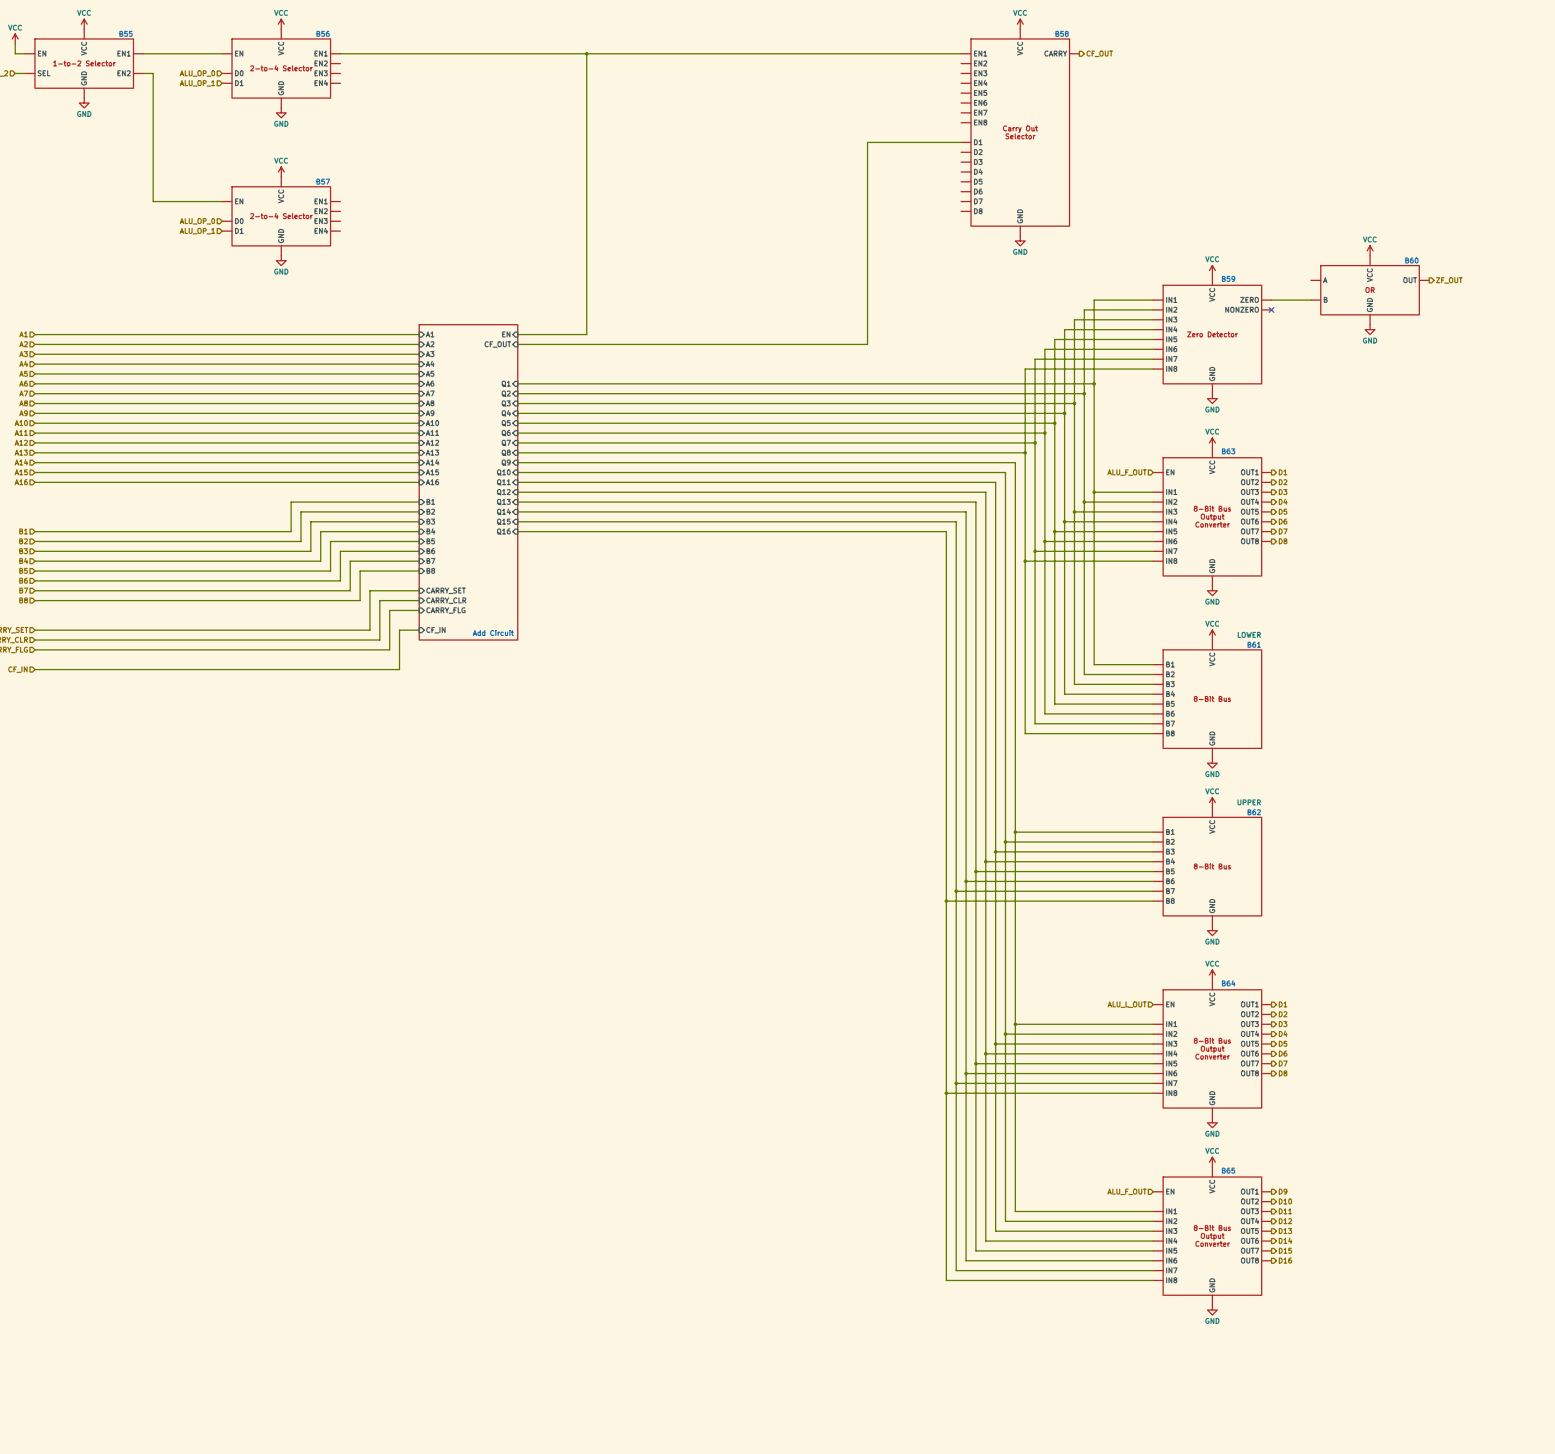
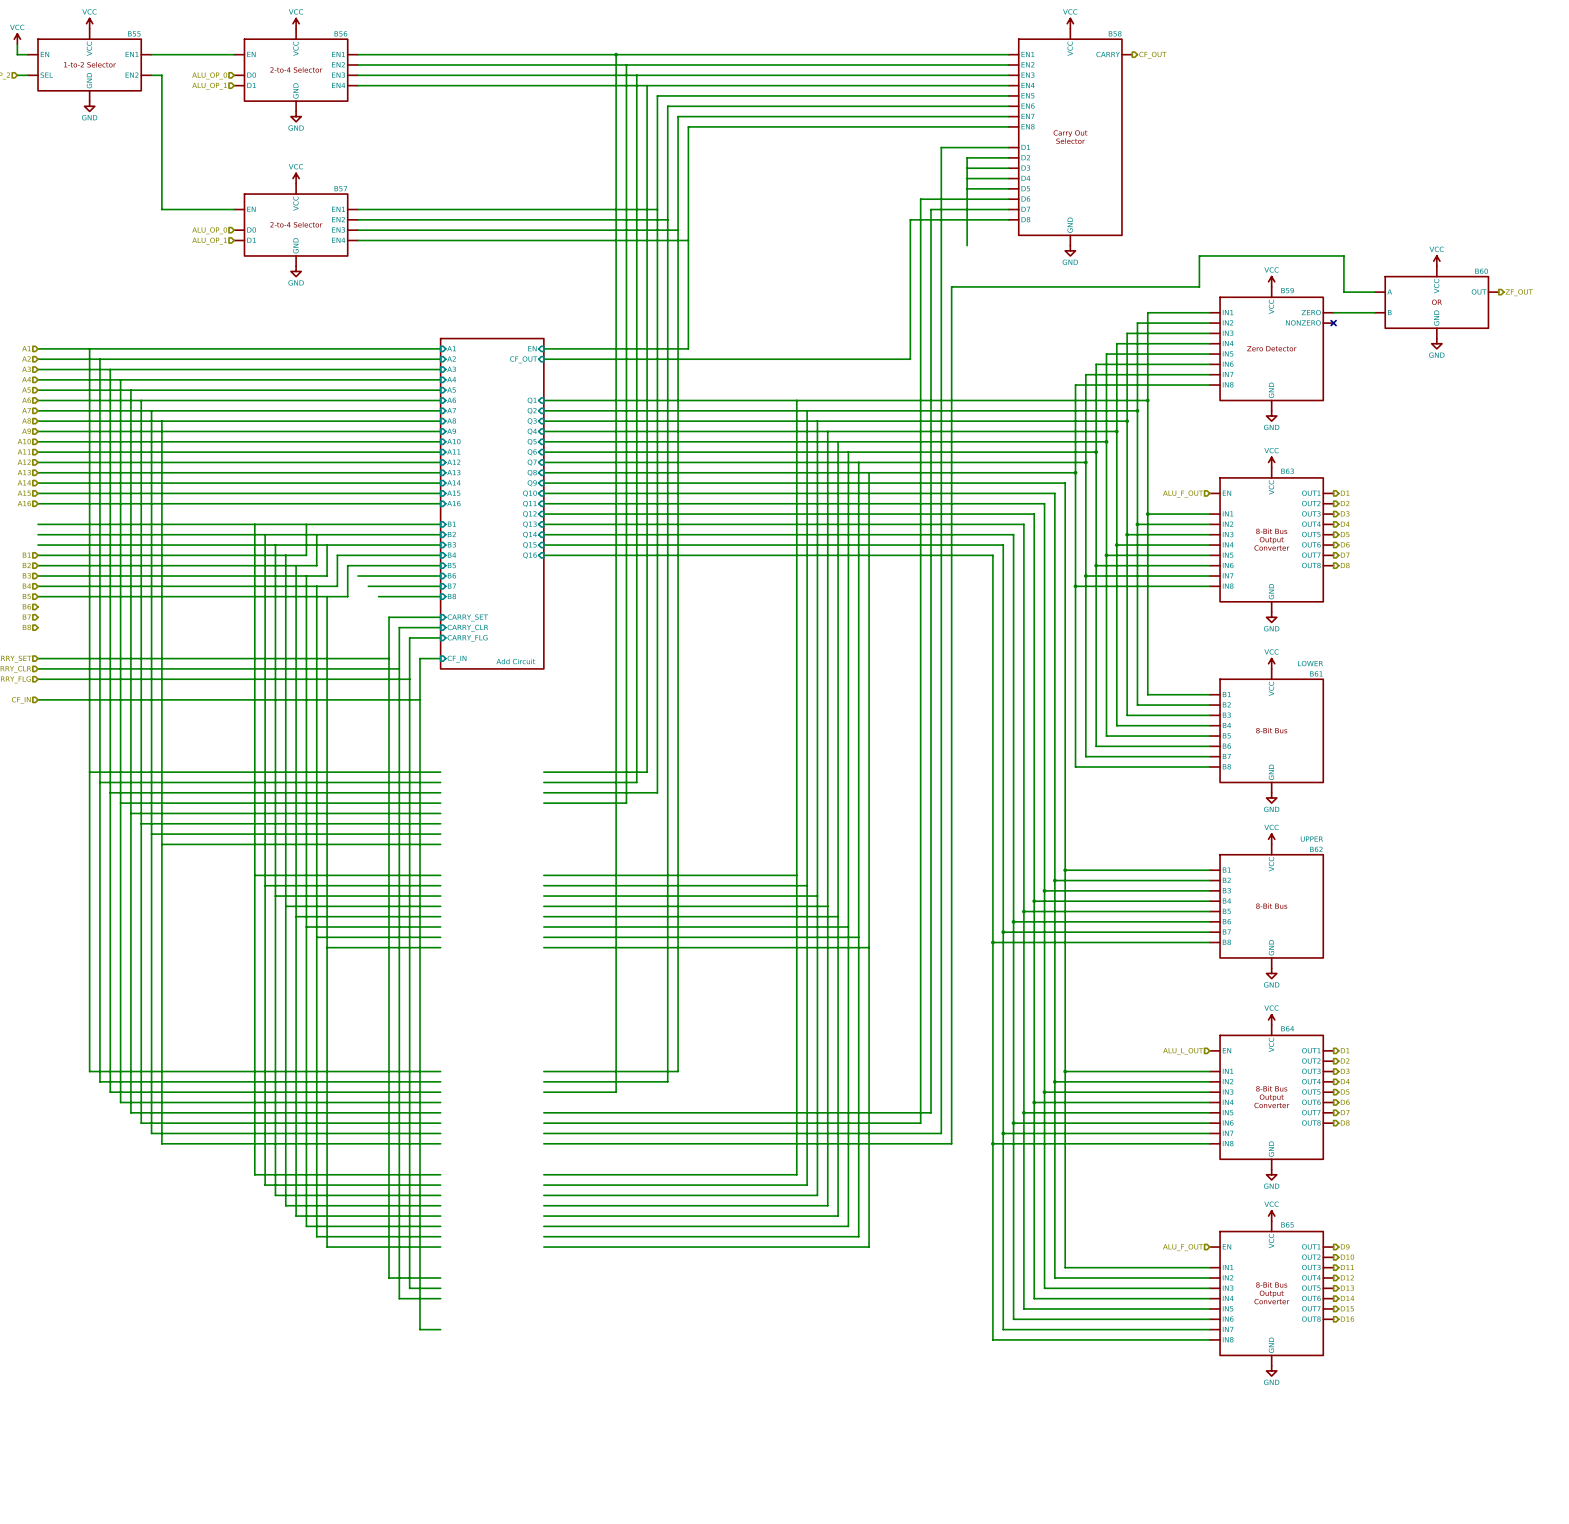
wire: none -> (358, 65) (1008, 65)
wire: none -> (626, 65) (626, 803) (543, 803)
wire: none -> (358, 75) (1008, 75)
wire: none -> (636, 75) (636, 782) (543, 782)
wire: none -> (358, 85) (1008, 85)
wire: none -> (647, 85) (647, 772) (543, 772)
wire: none -> (1008, 95) (657, 95) (657, 792) (543, 792)
wire: none -> (1008, 106) (667, 106) (667, 1081) (543, 1081)
wire: none -> (1008, 116) (678, 116) (678, 1071) (543, 1071)
wire: none -> (1008, 126) (688, 126) (688, 348) (616, 348) (616, 1092) (543, 1092)
wire: (897, 142) (867, 142) (867, 211) -> (1008, 219) (910, 219)
wire: none -> (941, 147) (941, 1133) (543, 1133)
wire: none -> (1008, 157) (967, 157) (967, 245)
wire: none -> (967, 168) (1008, 168)
wire: none -> (967, 178) (1008, 178)
wire: none -> (967, 188) (1008, 188)
wire: none -> (1008, 199) (920, 199) (920, 1123) (543, 1123)
wire: none -> (358, 209) (657, 209)
wire: none -> (1008, 209) (930, 209) (930, 1112) (543, 1112)
wire: none -> (358, 219) (667, 219)
wire: none -> (358, 230) (678, 230)
wire: none -> (358, 240) (688, 240)
wire: none -> (1374, 292) (1343, 292) (1343, 255) (1199, 255) (1199, 286) (951, 286) (951, 1143) (543, 1143)
wire: none -> (89, 348) (89, 1071) (440, 1071)
wire: none -> (99, 359) (99, 1081) (440, 1081)
wire: none -> (110, 369) (110, 1092) (440, 1092)
wire: none -> (120, 379) (120, 1102) (440, 1102)
wire: none -> (130, 390) (130, 1112) (440, 1112)
wire: none -> (141, 400) (141, 1123) (440, 1123)
wire: none -> (796, 400) (796, 1174) (543, 1174)
wire: none -> (151, 410) (151, 1133) (440, 1133)
wire: none -> (807, 410) (807, 1185) (543, 1185)
wire: none -> (161, 421) (161, 1143) (440, 1143)
wire: none -> (817, 421) (817, 1195) (543, 1195)
wire: none -> (827, 431) (827, 1205) (543, 1205)
wire: none -> (838, 441) (838, 1216) (543, 1216)
wire: none -> (848, 452) (848, 1226) (543, 1226)
wire: none -> (858, 462) (858, 1236) (543, 1236)
wire: none -> (869, 472) (869, 1247) (543, 1247)
wire: none -> (38, 524) (306, 524)
wire: none -> (254, 524) (254, 1174) (440, 1174)
wire: none -> (38, 534) (316, 534)
wire: none -> (265, 534) (265, 1185) (440, 1185)
wire: none -> (38, 545) (327, 545)
wire: none -> (275, 545) (275, 1195) (440, 1195)
wire: none -> (285, 555) (285, 1205) (440, 1205)
wire: none -> (296, 565) (296, 1216) (440, 1216)
wire: none -> (306, 576) (306, 1226) (440, 1226)
wire: (340, 551) (340, 580) (34, 580) -> none
wire: none -> (316, 586) (316, 1236) (440, 1236)
wire: (350, 561) (350, 590) (34, 590) -> none
wire: none -> (327, 596) (327, 1247) (440, 1247)
wire: (360, 571) (360, 600) (34, 600) -> none
wire: none -> (389, 658) (389, 1278) (440, 1278)
wire: none -> (399, 668) (399, 1298) (440, 1298)
wire: none -> (409, 679) (409, 1288) (440, 1288)
wire: none -> (419, 699) (419, 1329) (440, 1329)
wire: none -> (89, 772) (440, 772)
wire: none -> (99, 782) (440, 782)
wire: none -> (110, 792) (440, 792)
wire: none -> (120, 803) (440, 803)
wire: none -> (130, 813) (440, 813)
wire: none -> (141, 823) (440, 823)
wire: none -> (151, 834) (440, 834)
wire: none -> (161, 844) (440, 844)
wire: none -> (254, 875) (440, 875)
wire: none -> (543, 875) (796, 875)
wire: none -> (265, 885) (440, 885)
wire: none -> (543, 885) (807, 885)
wire: none -> (275, 896) (440, 896)
wire: none -> (543, 896) (817, 896)
wire: none -> (285, 906) (440, 906)
wire: none -> (543, 906) (827, 906)
wire: none -> (296, 916) (440, 916)
wire: none -> (543, 916) (838, 916)
wire: none -> (306, 927) (440, 927)
wire: none -> (543, 927) (848, 927)
wire: none -> (316, 937) (440, 937)
wire: none -> (543, 937) (858, 937)
wire: none -> (327, 947) (440, 947)
wire: none -> (543, 947) (869, 947)

